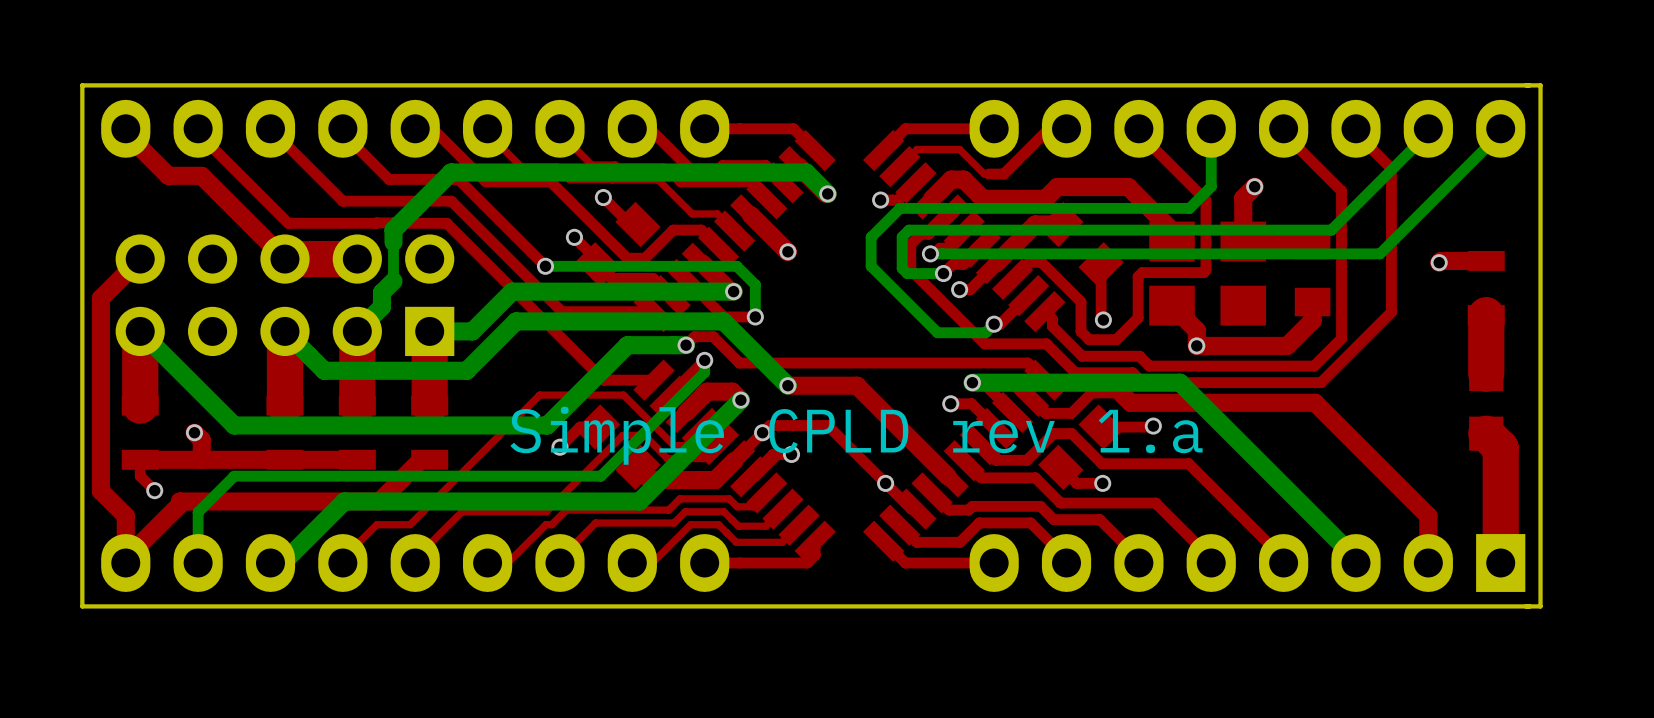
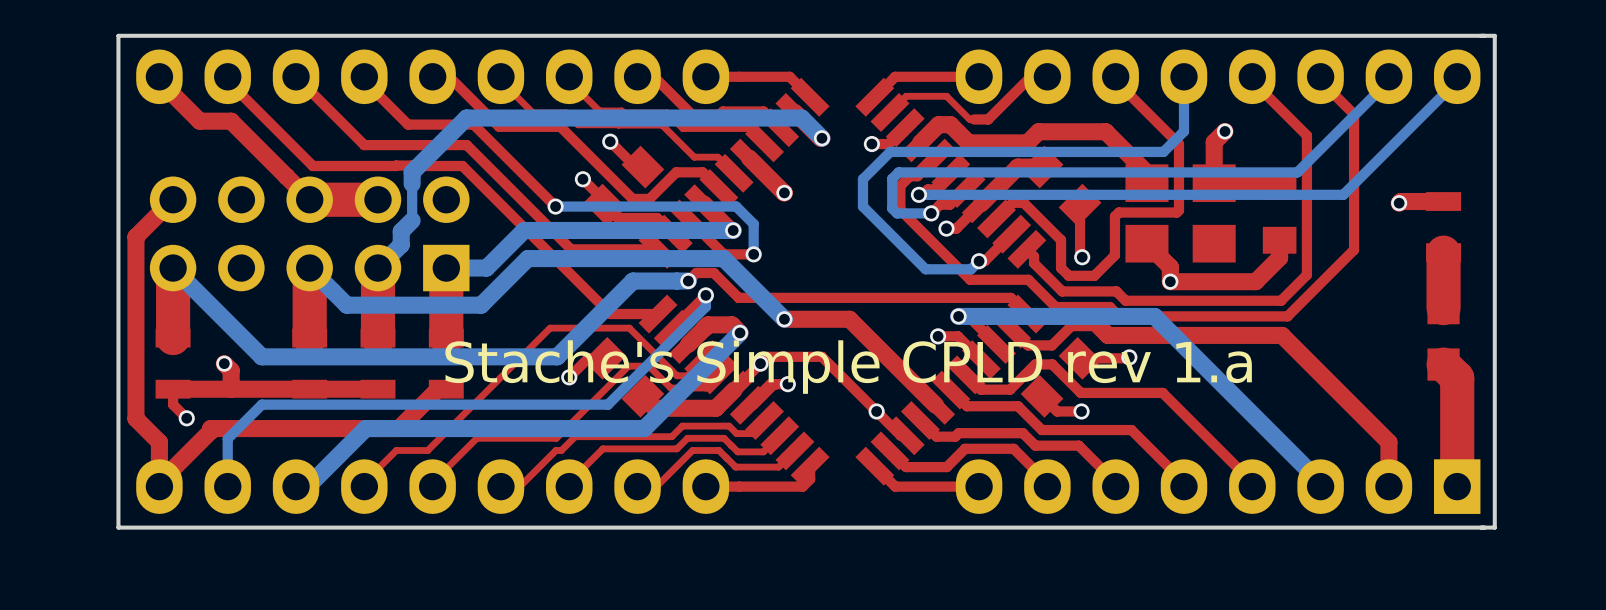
text: Simple CPLD rev 1.a (856, 435) -> Stache's Simple CPLD rev 1.a (848, 367)

